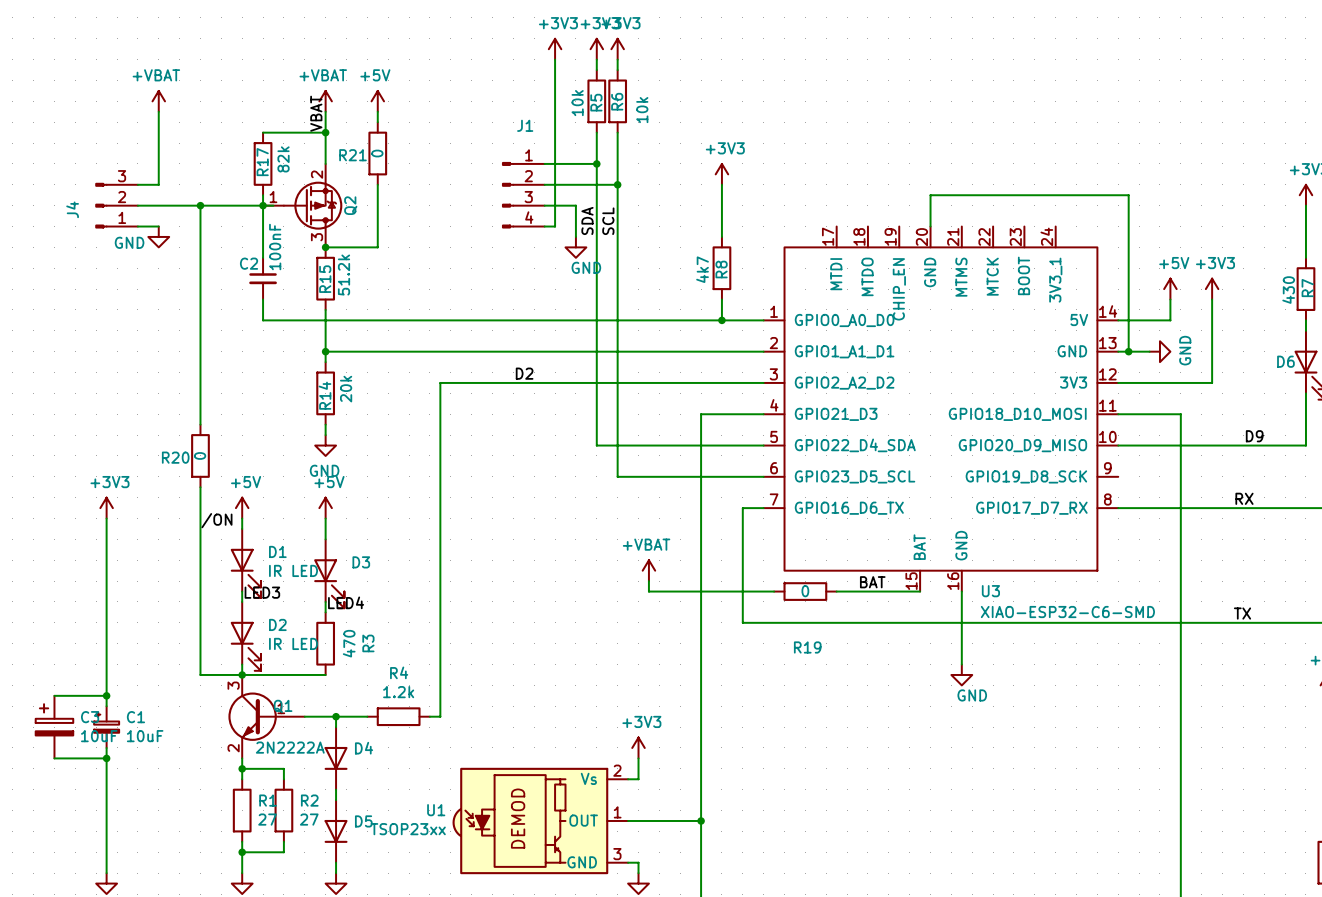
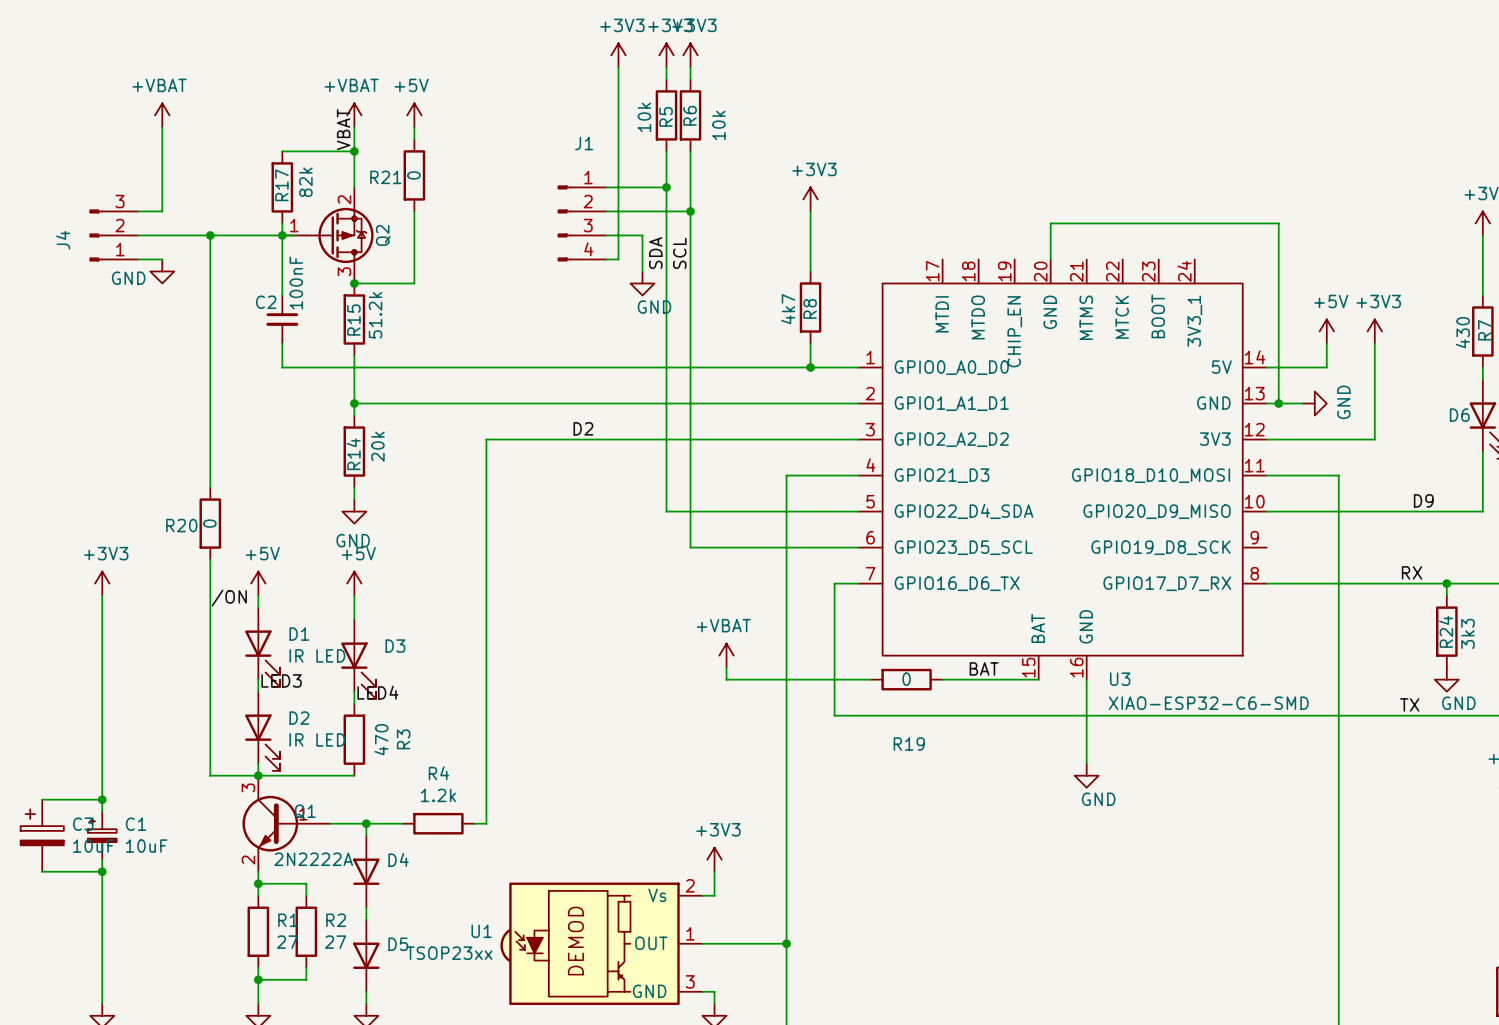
wire: none -> (1446, 583) (1446, 595)
junction: none -> (1446, 583)
R24: none -> 3k3 (1446, 631)
power symbol: none -> GND (1446, 679)

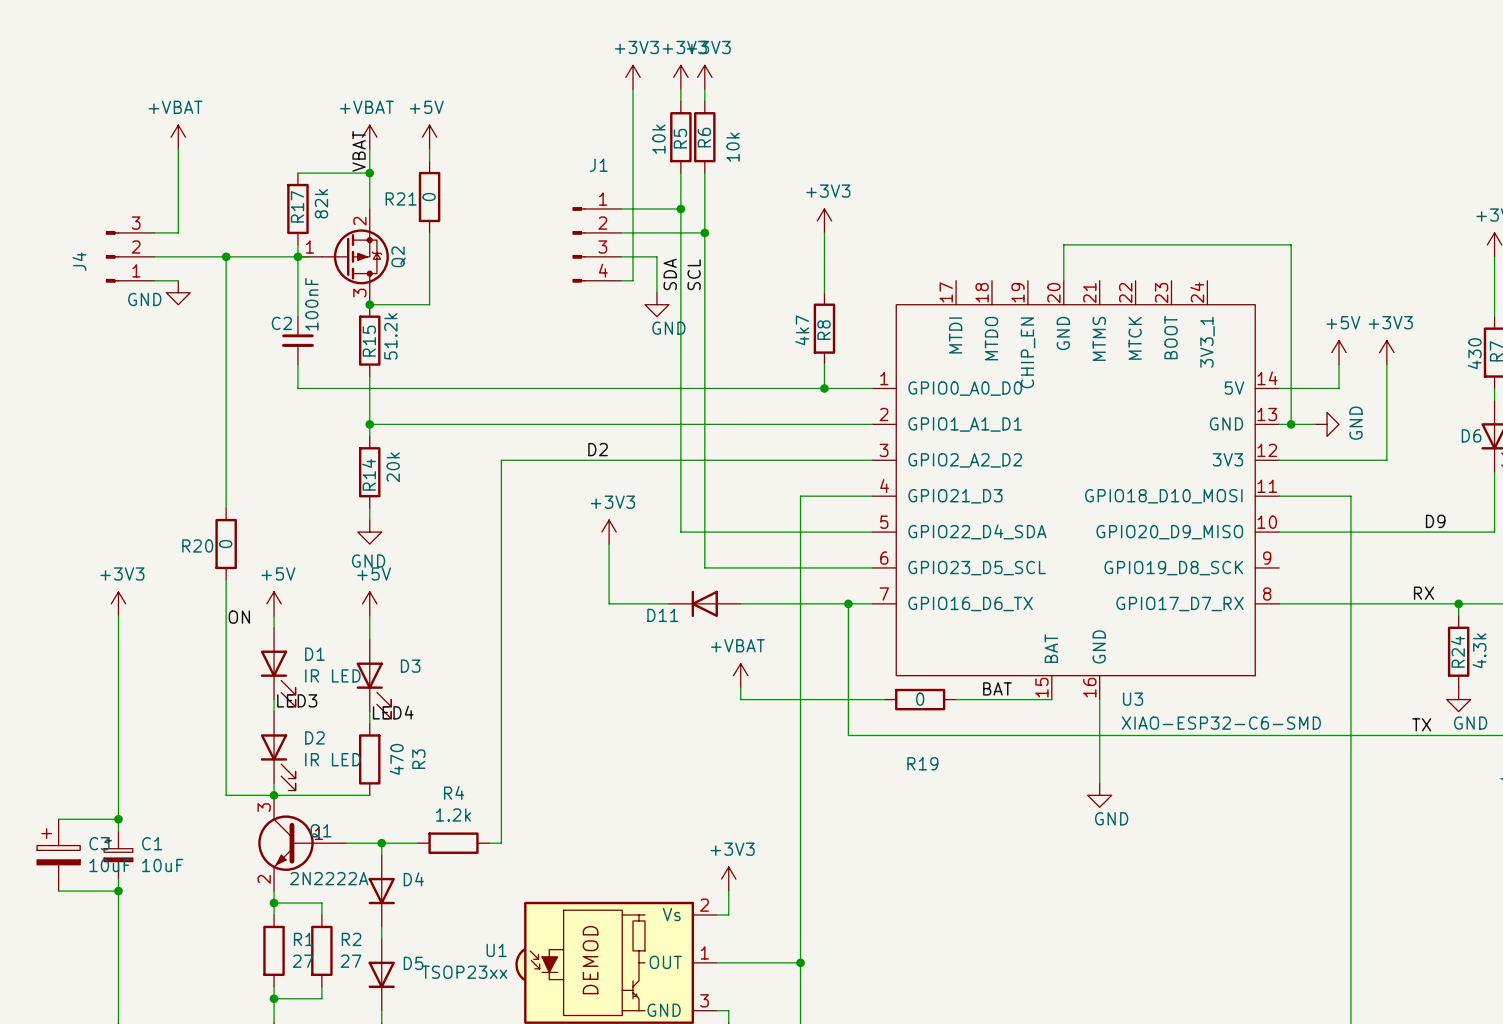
power symbol: none -> +3V3 (609, 532)
wire: none -> (609, 544) (609, 603) (668, 603)
D11: none -> (704, 603)
wire: none -> (740, 603) (848, 603)
junction: none -> (848, 603)
label: /ON (229, 598) -> ON (239, 617)
R24 value: 3k3 (1467, 633) -> 4.3k (1479, 650)

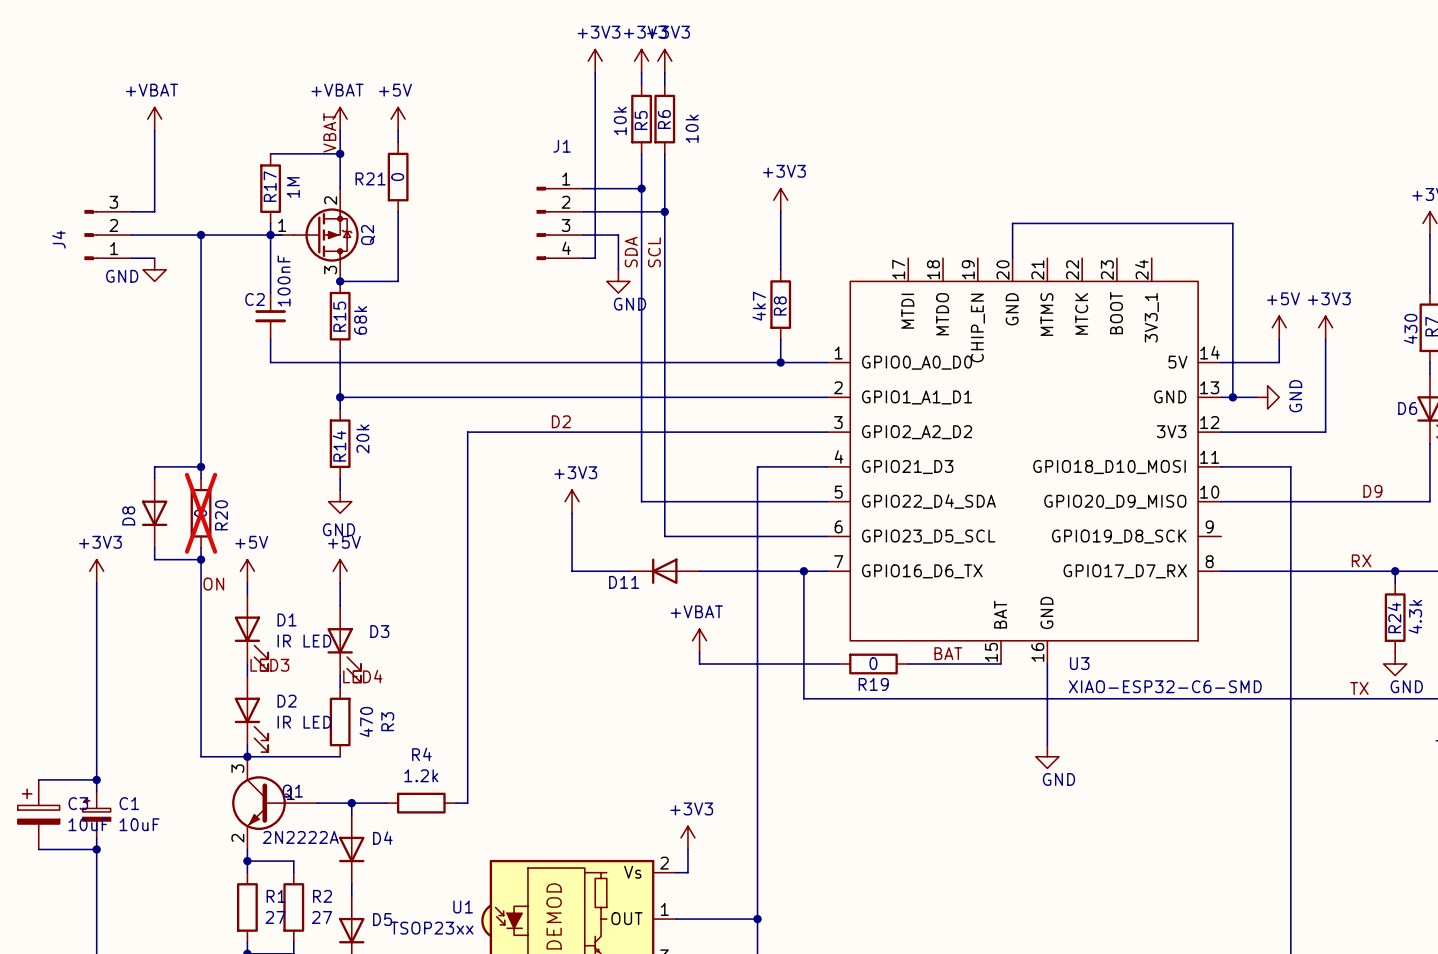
R17 value: 82k (321, 203) -> 1M (293, 187)
R15 value: 51.2k (390, 336) -> 68k (360, 320)
wire: none -> (201, 466) (154, 466) (154, 478)
junction: none -> (201, 466)
D8: none -> (154, 513)
R20 do-not-place cross: none -> (201, 513)
R20 name rotation: 0° (197, 545) -> 90° counterclockwise (221, 515)
R20 name position: R20 (197, 545) -> R20 (221, 515)
wire: none -> (154, 548) (154, 559) (201, 559)
junction: none -> (201, 559)
R19 name position: R19 (922, 763) -> R19 (873, 684)

